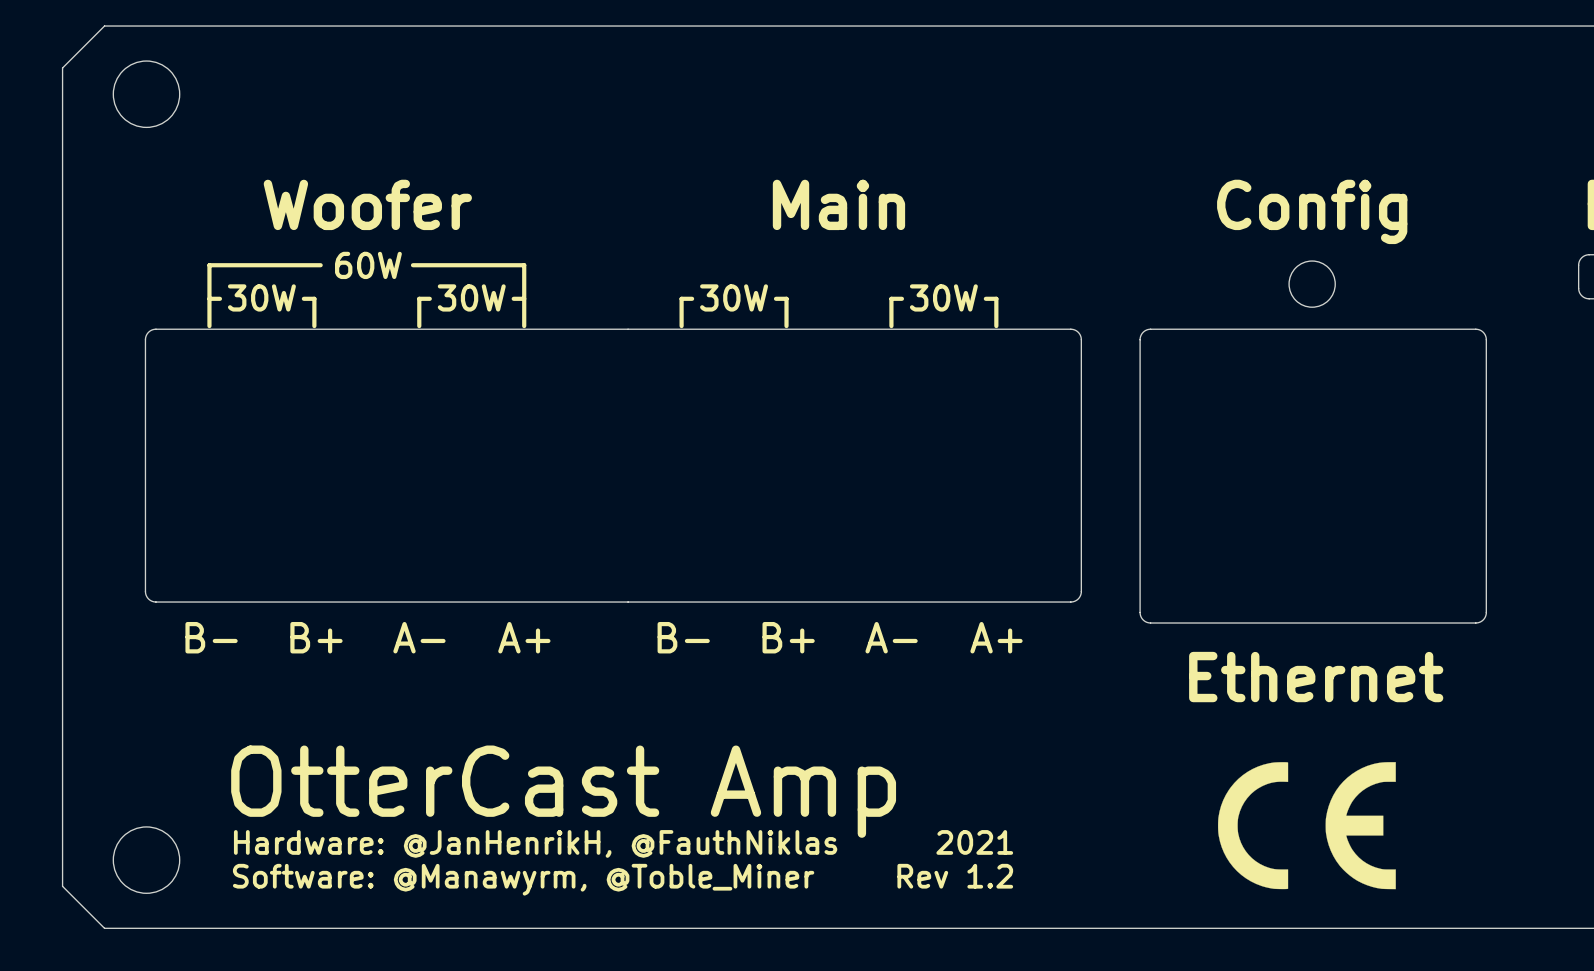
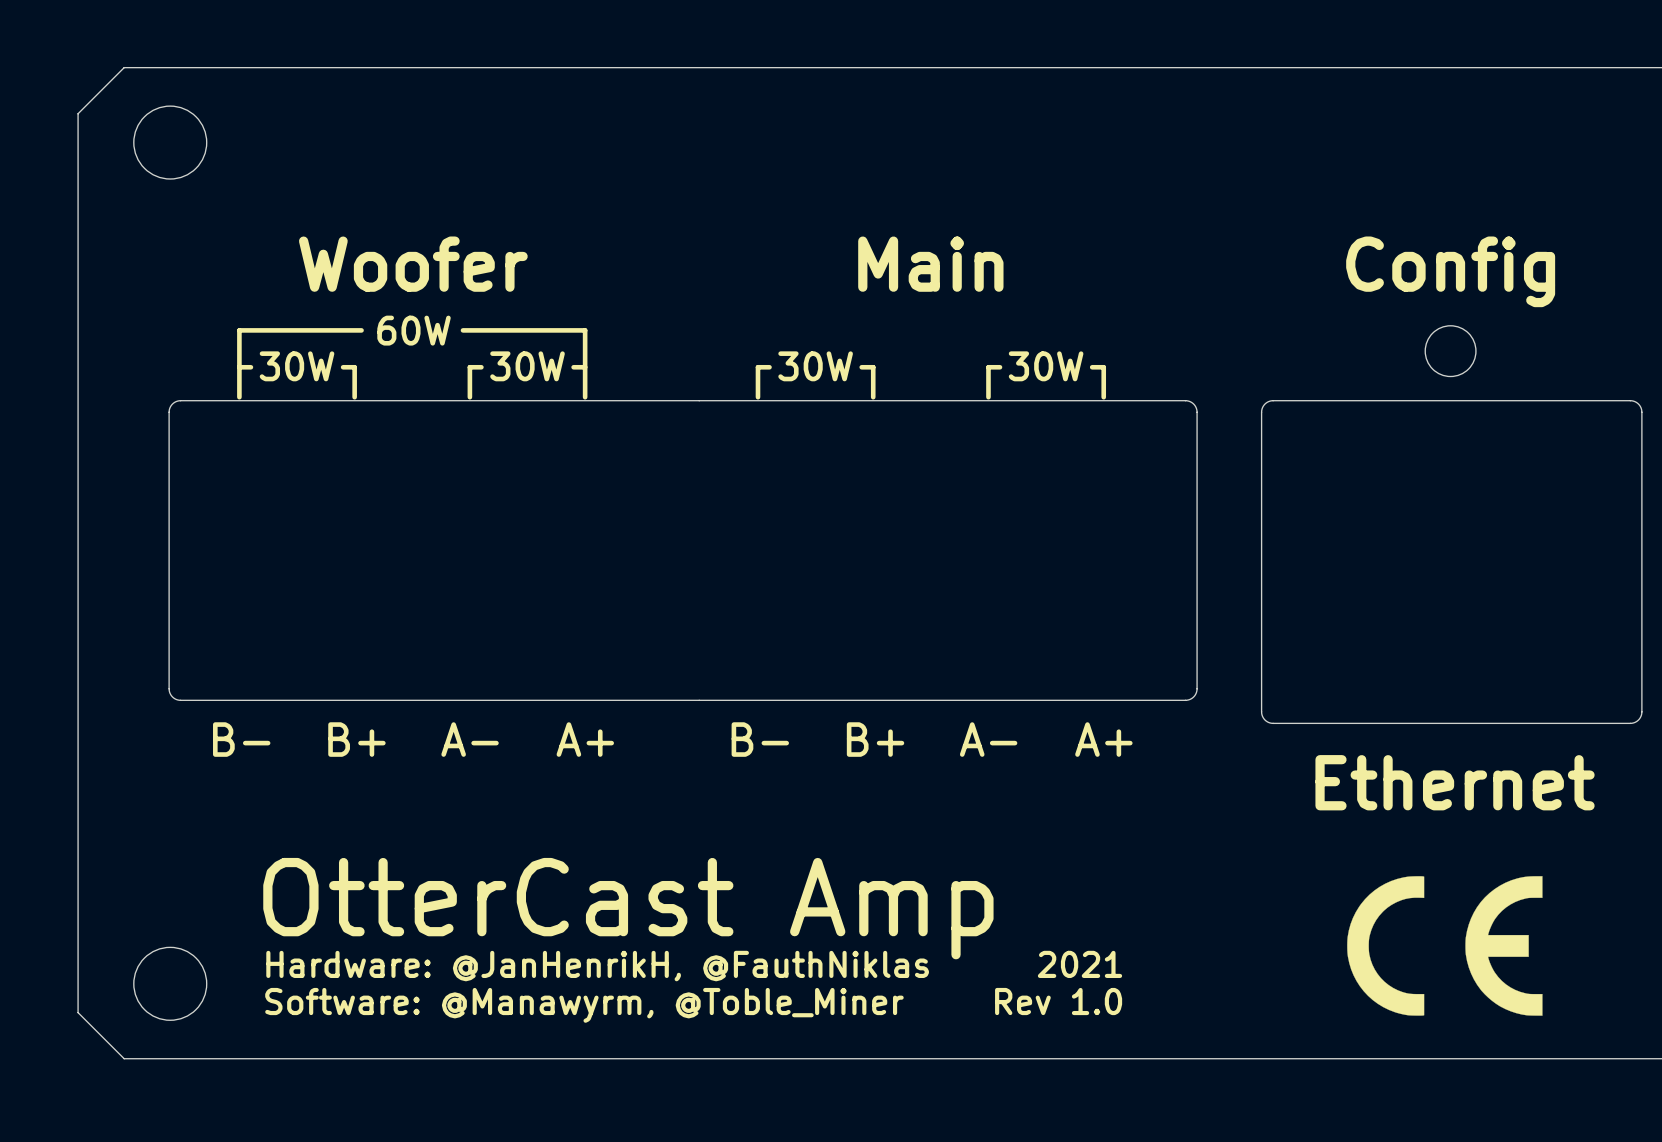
text: Software: @Manawyrm, @Toble_Miner Rev 1.2 (623, 879) -> Software: @Manawyrm, @Toble_Miner Rev 1.0 (693, 1005)

